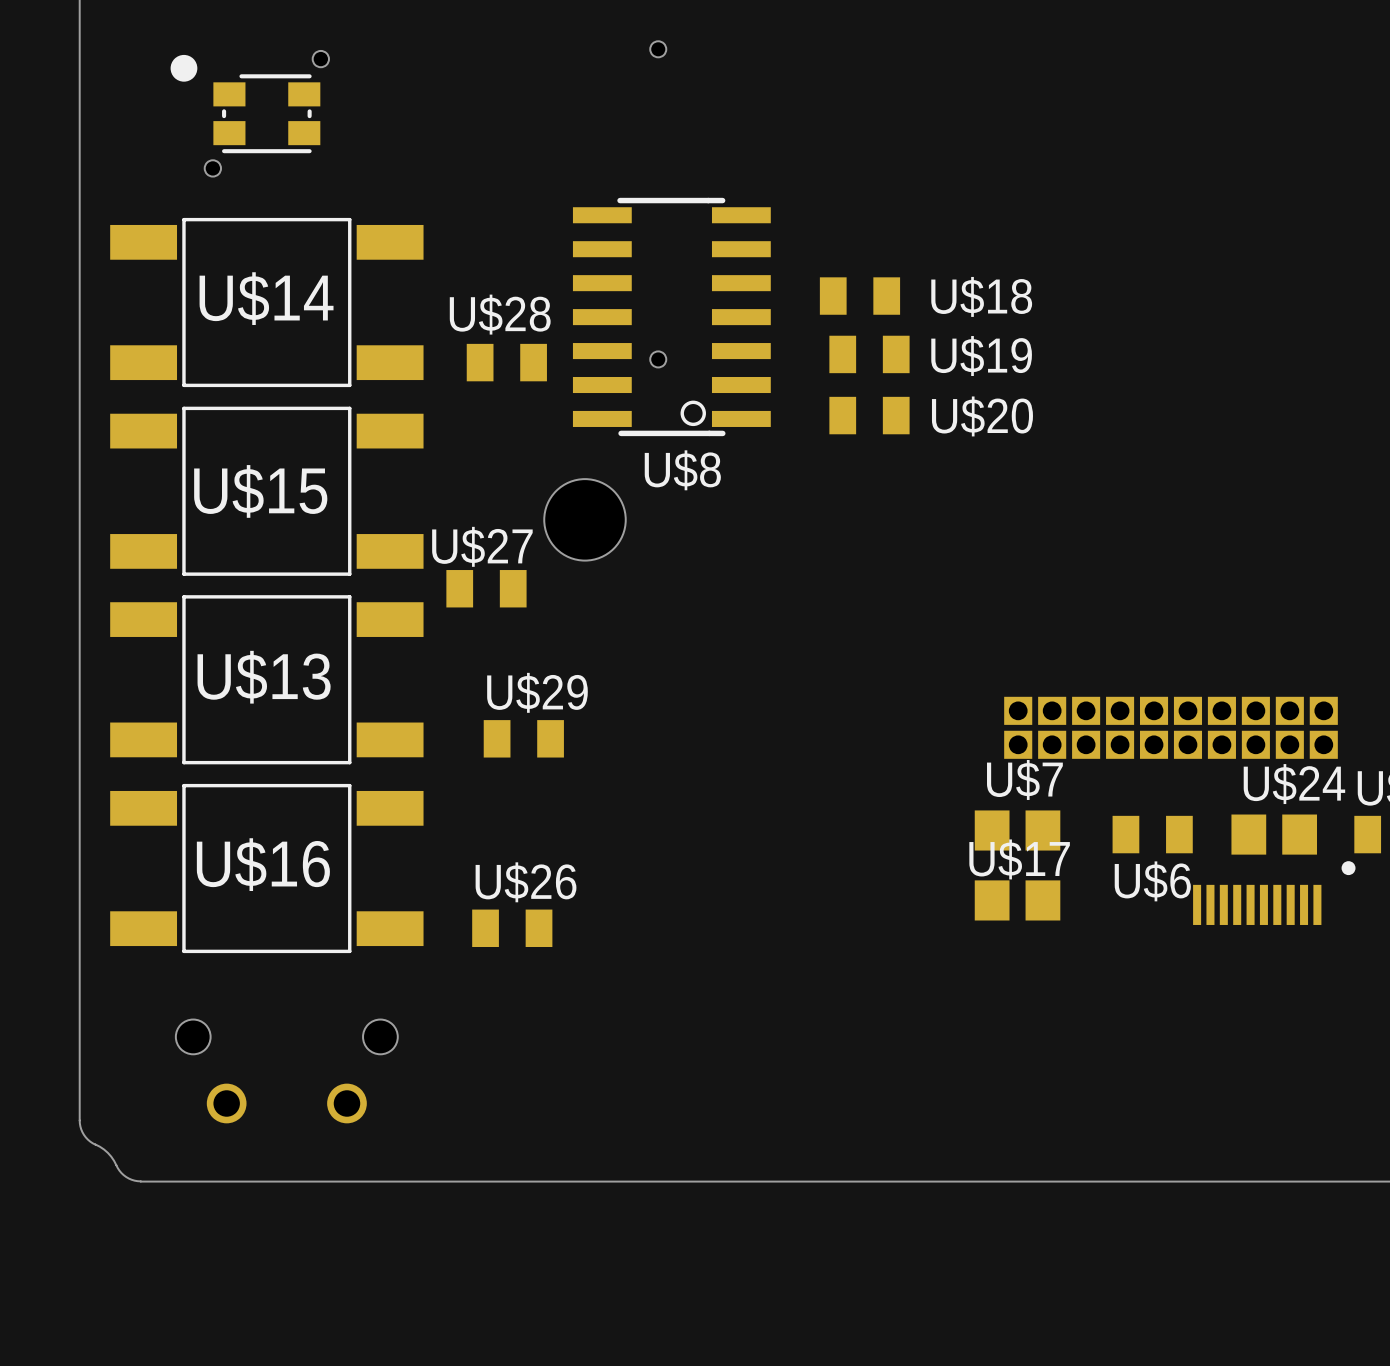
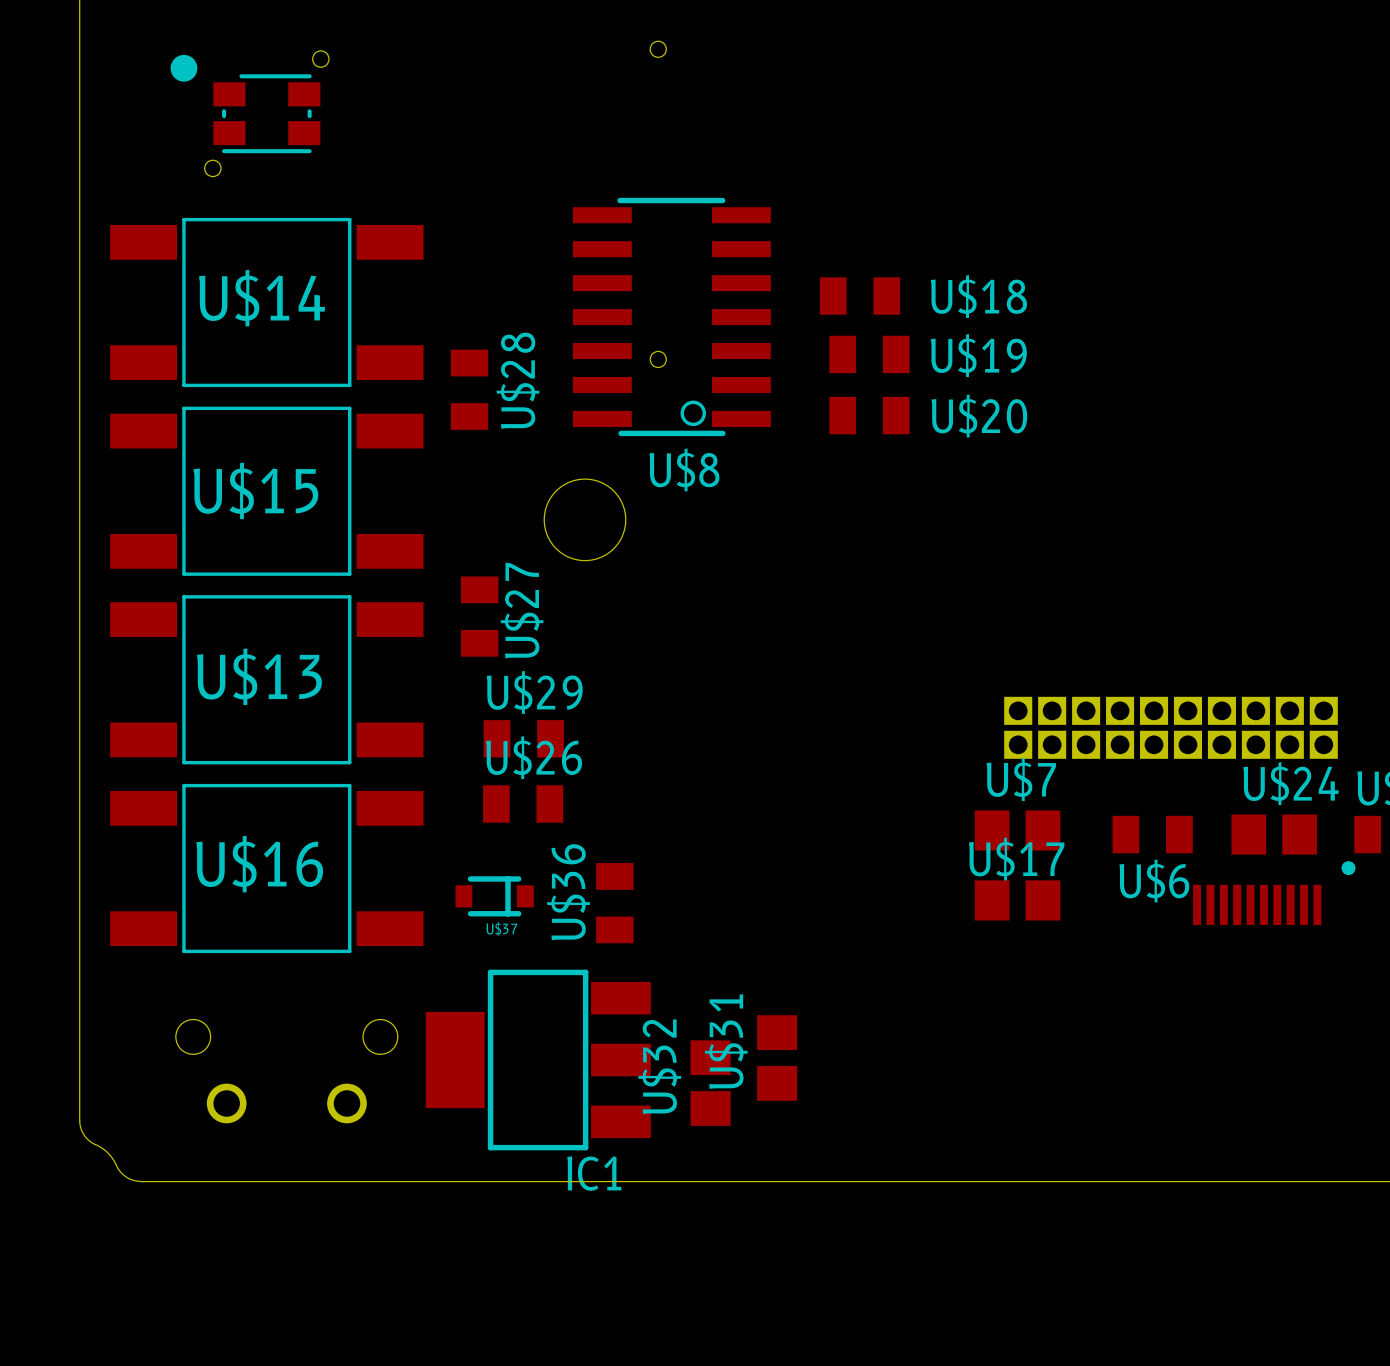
U$28 rotation: 0° (506, 362) -> 90° clockwise (469, 389)
U$27 rotation: 0° (486, 588) -> 90° clockwise (479, 616)
U$37: none -> (494, 896)
U$36: none -> (614, 903)
U$26 position: (512, 928) -> (523, 804)
U$31: none -> (777, 1057)
IC1: none -> (538, 1060)
U$32: none -> (710, 1083)

